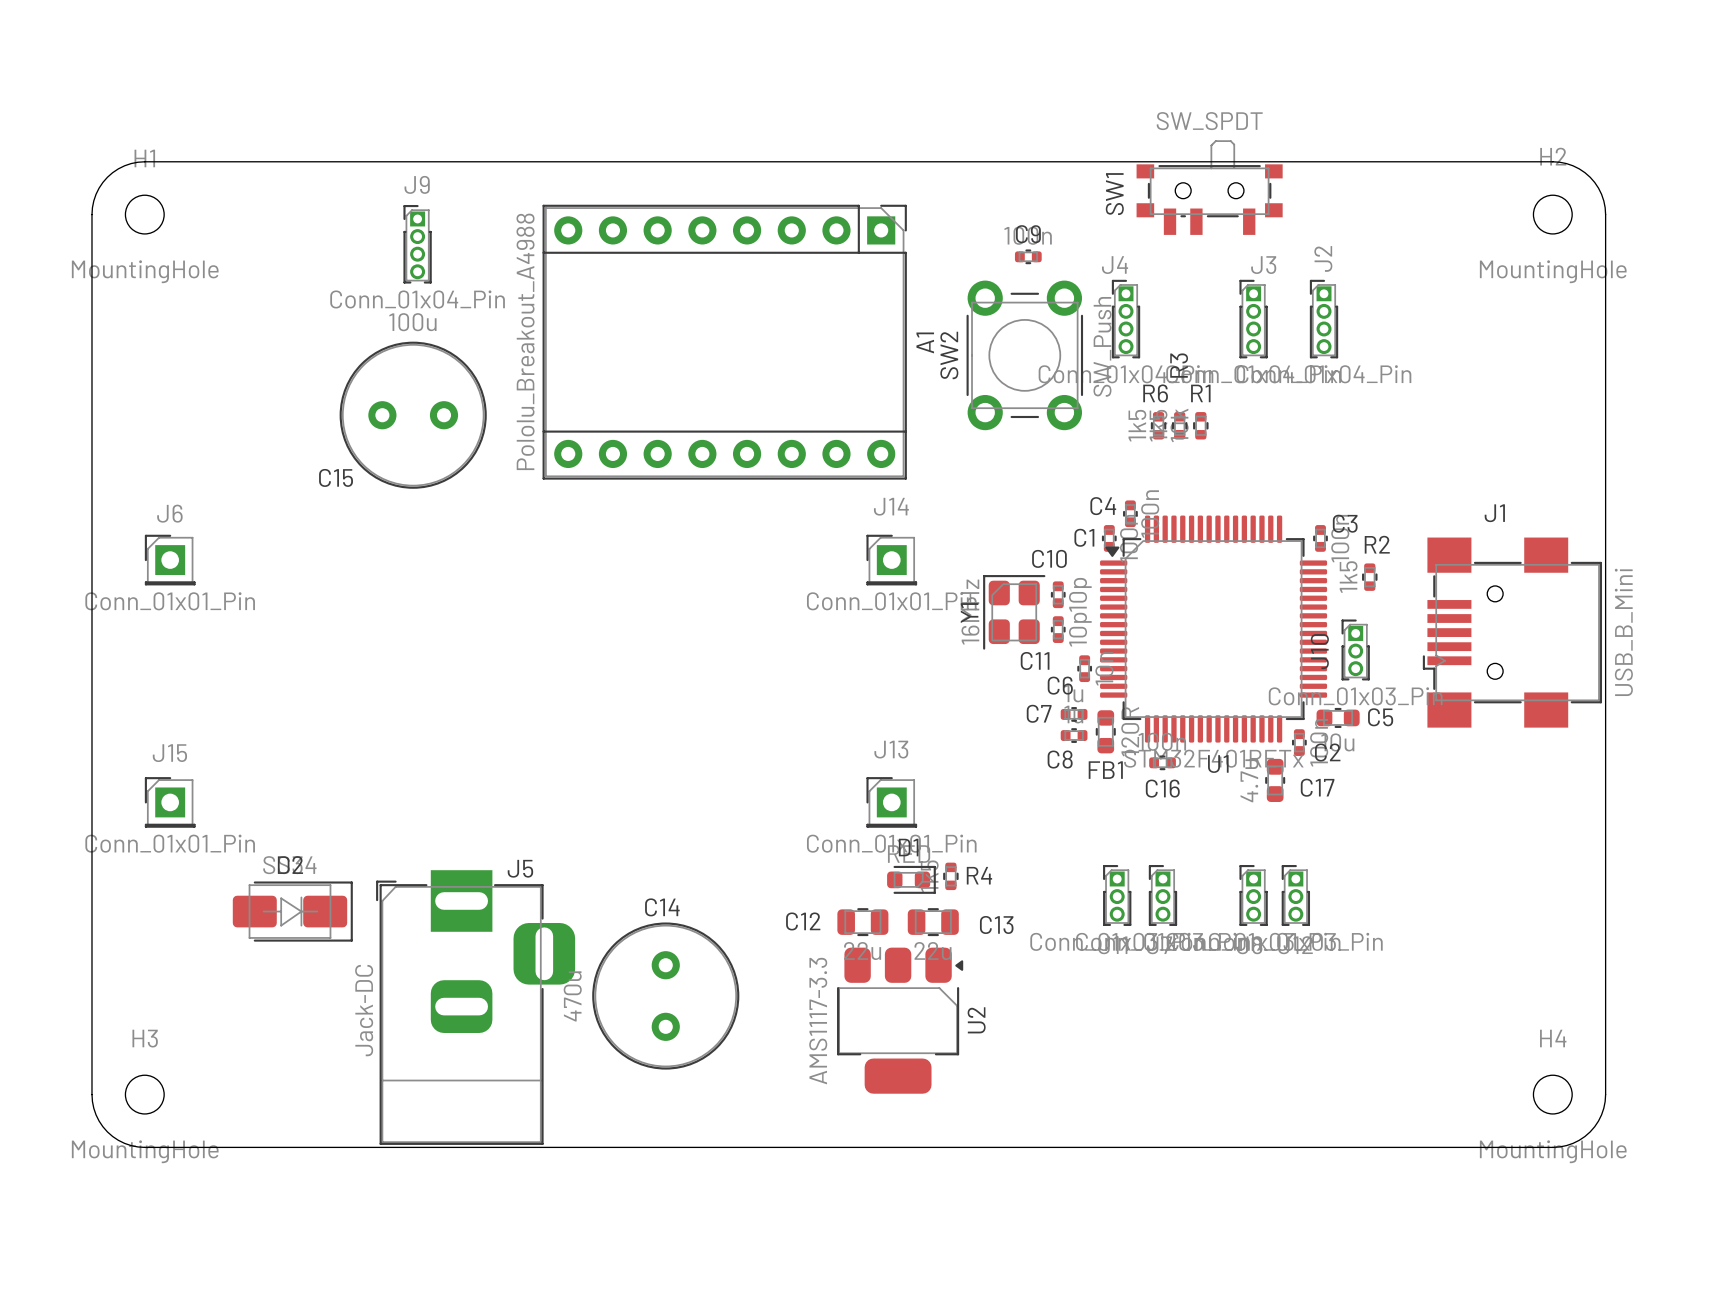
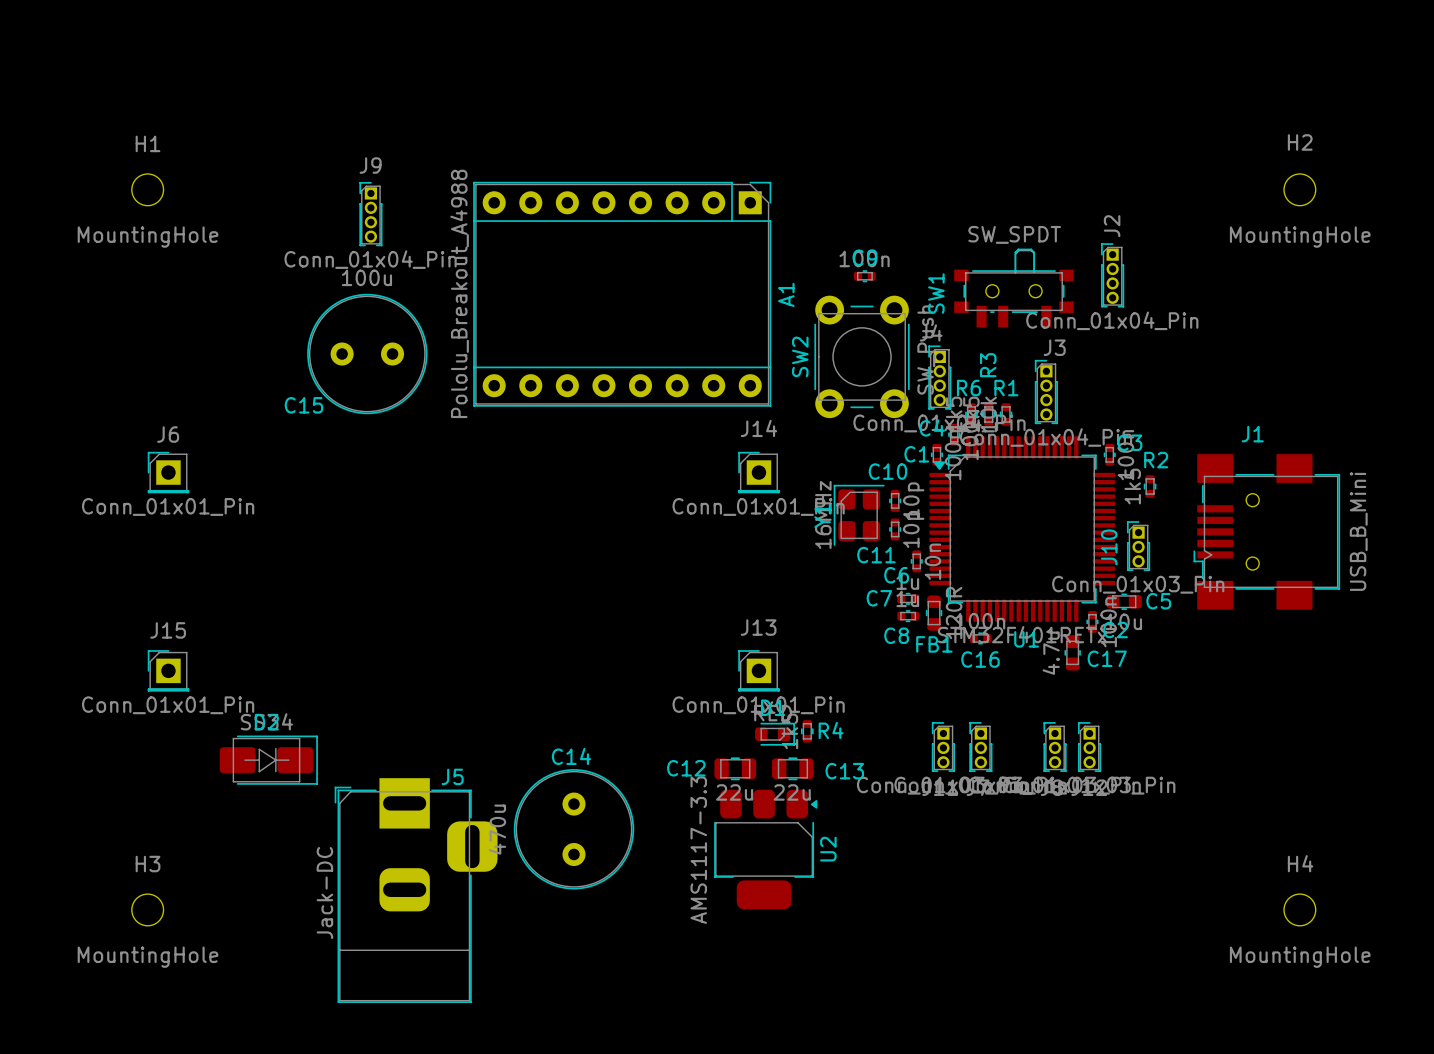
SW1 footprint: [1136, 140, 1283, 235] -> [954, 248, 1074, 328]
board edge: (144, 161) (1552, 161) (1566, 163) (1579, 168) (1590, 177) (1598, 188) (1603, 200) (1605, 214) (1605, 1094) (1603, 1108) (1598, 1120) (1590, 1131) (1579, 1140) (1566, 1145) (1552, 1147) (144, 1147) (131, 1145) (118, 1140) (107, 1131) (99, 1120) (93, 1108) (91, 1094) (91, 214) (96, 194) (107, 177) (124, 165) (144, 161) -> none
C9 position: (1028, 256) -> (864, 276)
J4 position: (1126, 319) -> (939, 377)
J3 position: (1253, 319) -> (1046, 392)
SW2 position: (1024, 355) -> (862, 356)
R6 position: (1158, 425) -> (971, 414)
R3 position: (1179, 425) -> (988, 414)
R1 position: (1200, 425) -> (1006, 414)
J5 position: (475, 1007) -> (416, 890)

